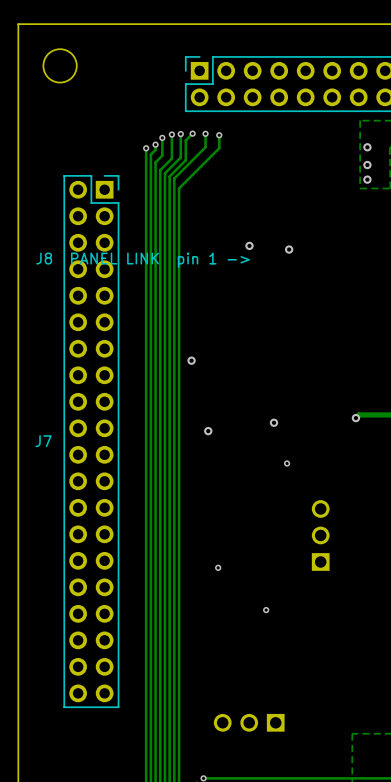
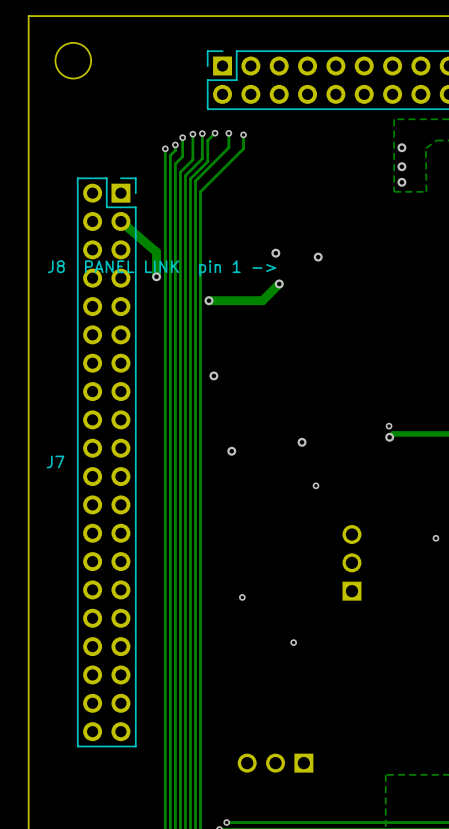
track: none -> (120, 221) (156, 252) (156, 276)
via: none -> (156, 276)
track: none -> (279, 283) (262, 300) (208, 300)
via: none -> (279, 283)
via: none -> (208, 300)
via: none -> (389, 426)

